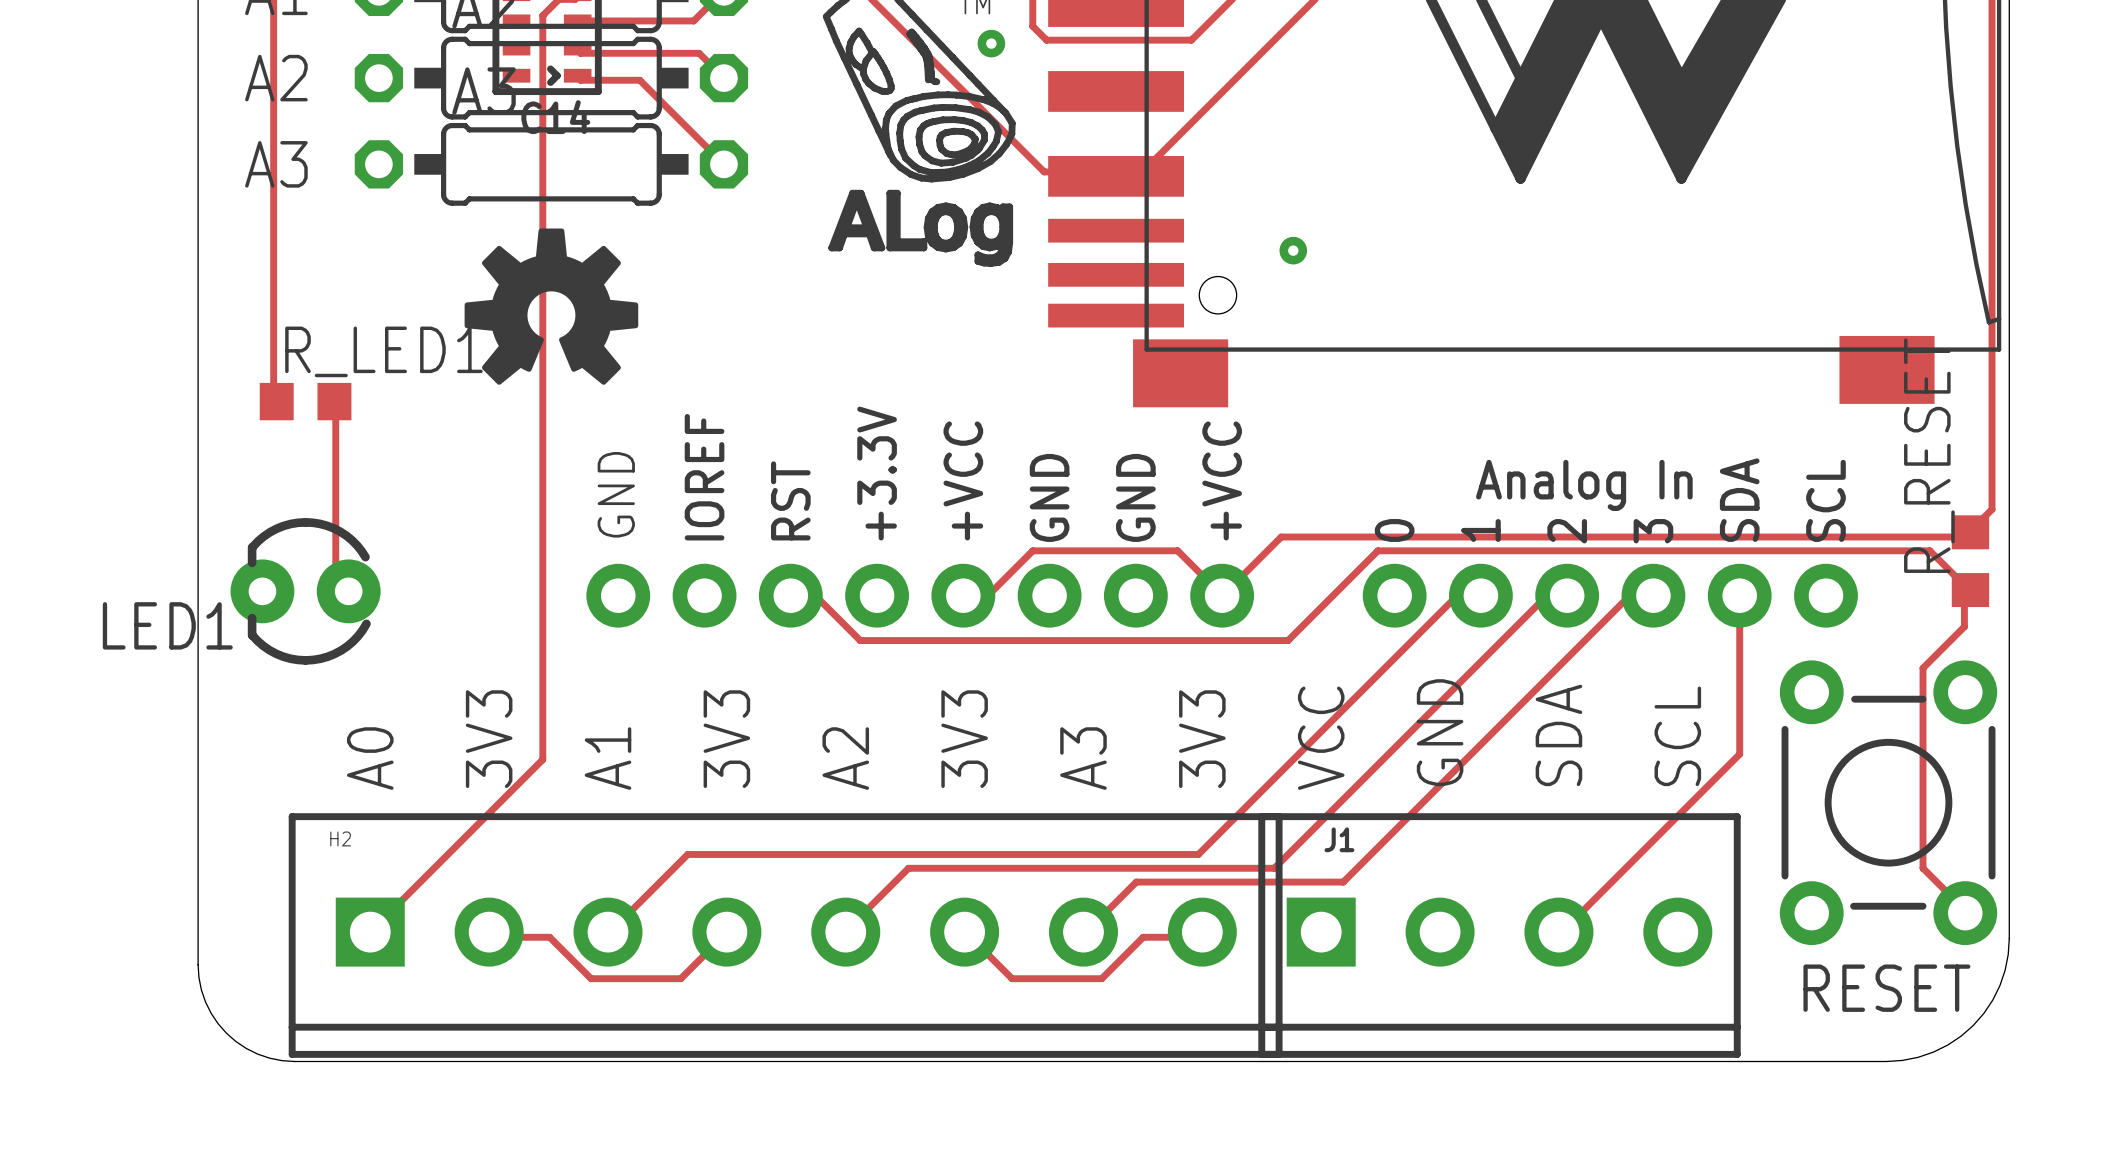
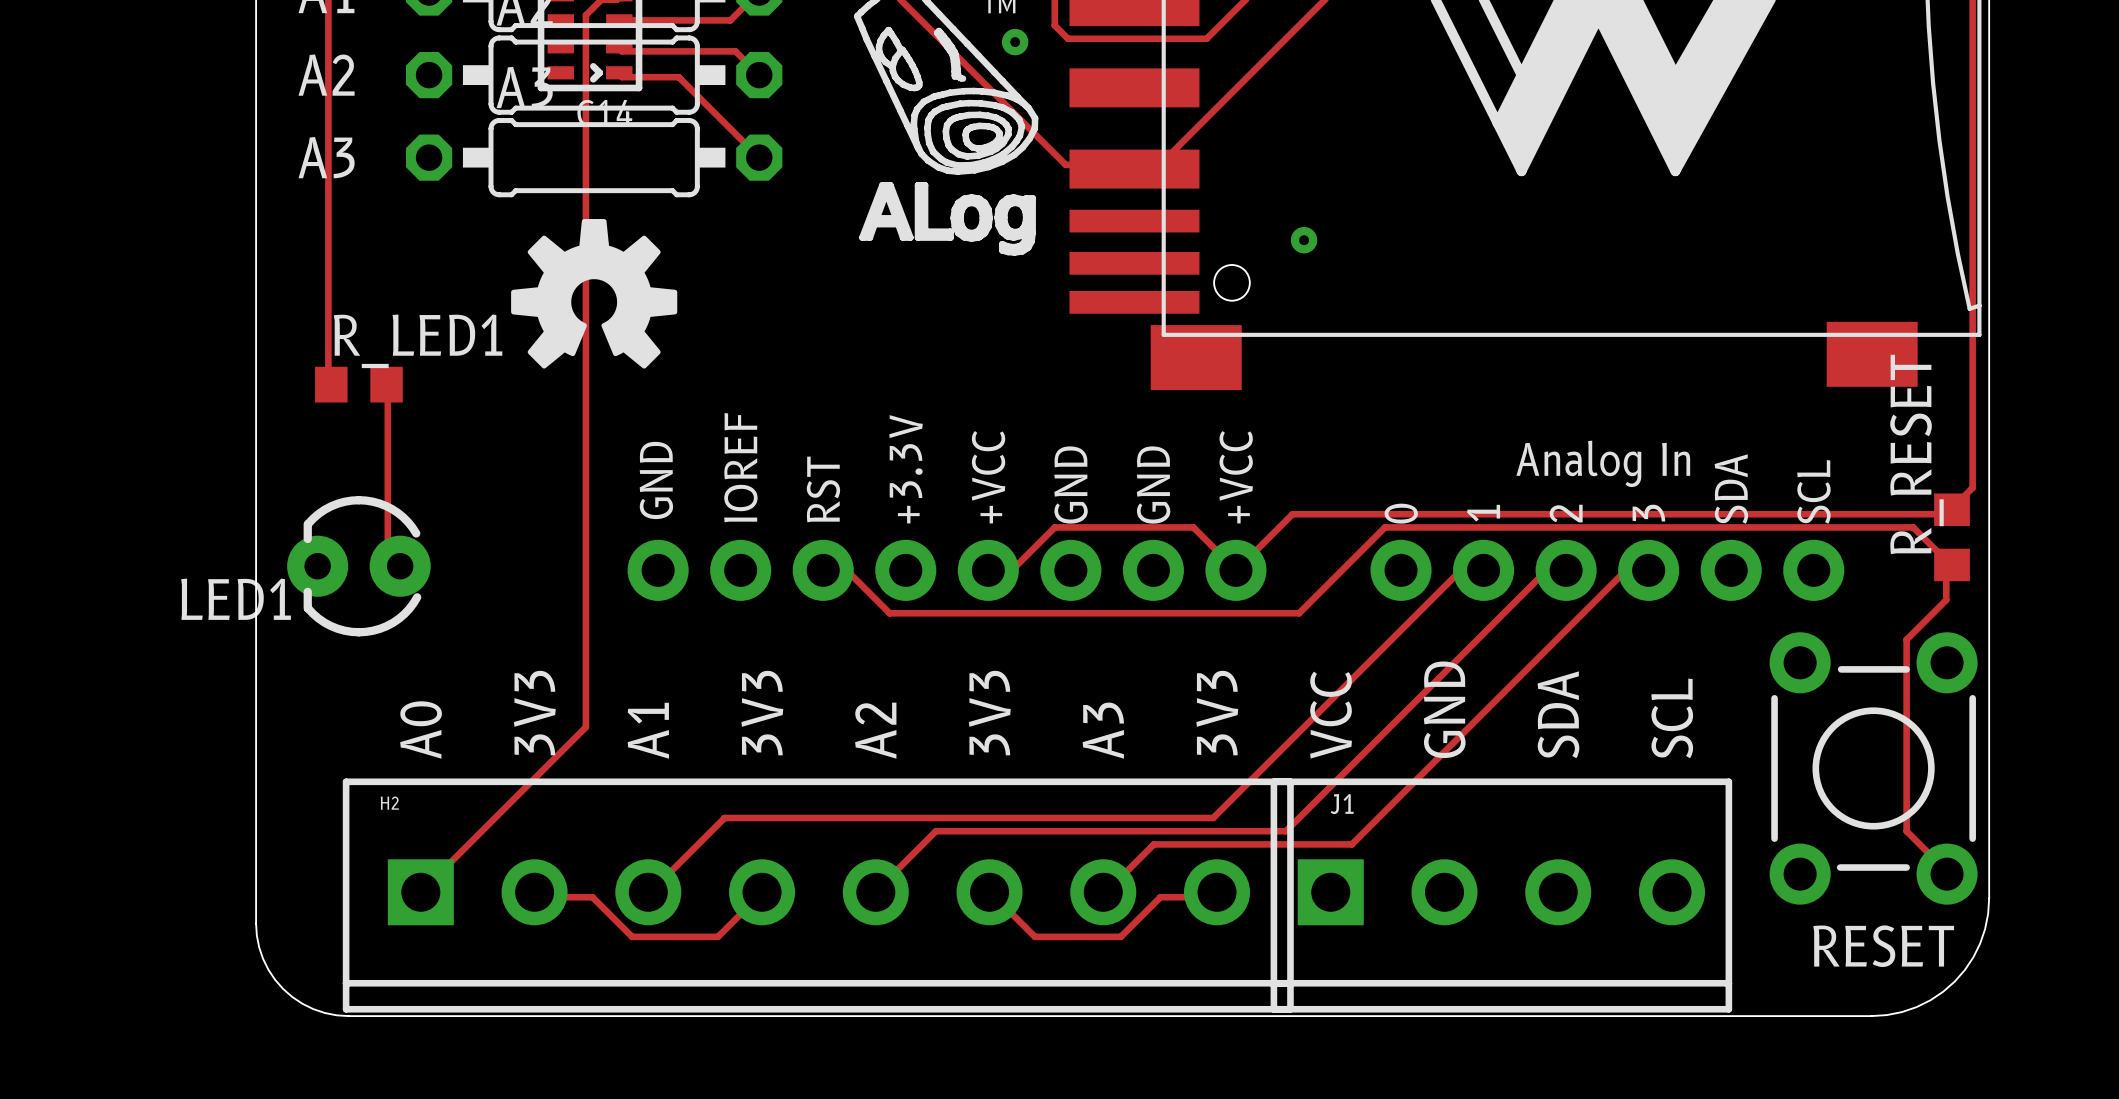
track: (1739, 595) (1739, 754) (1561, 932) (1558, 932) -> none

